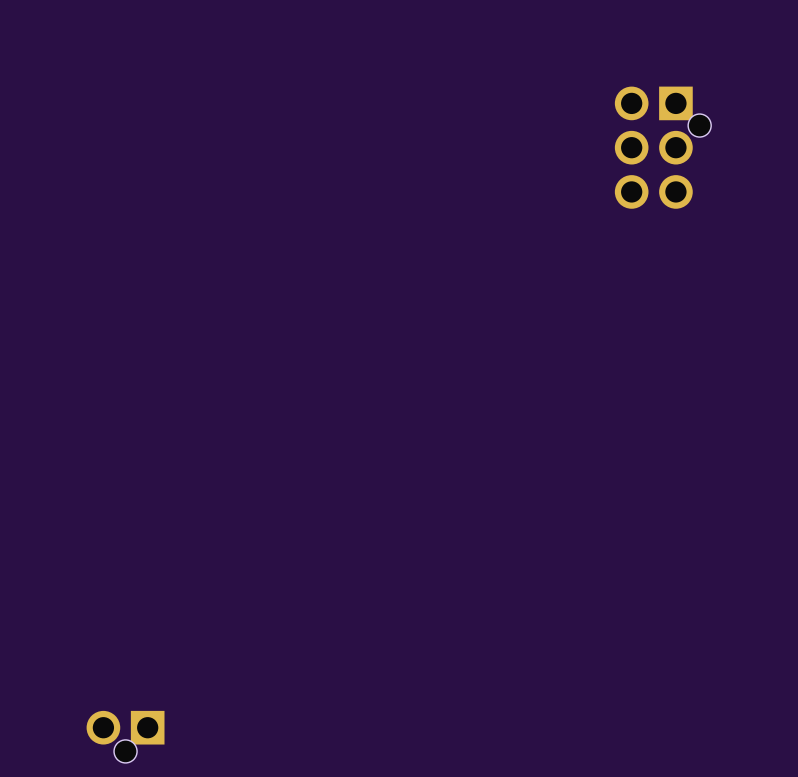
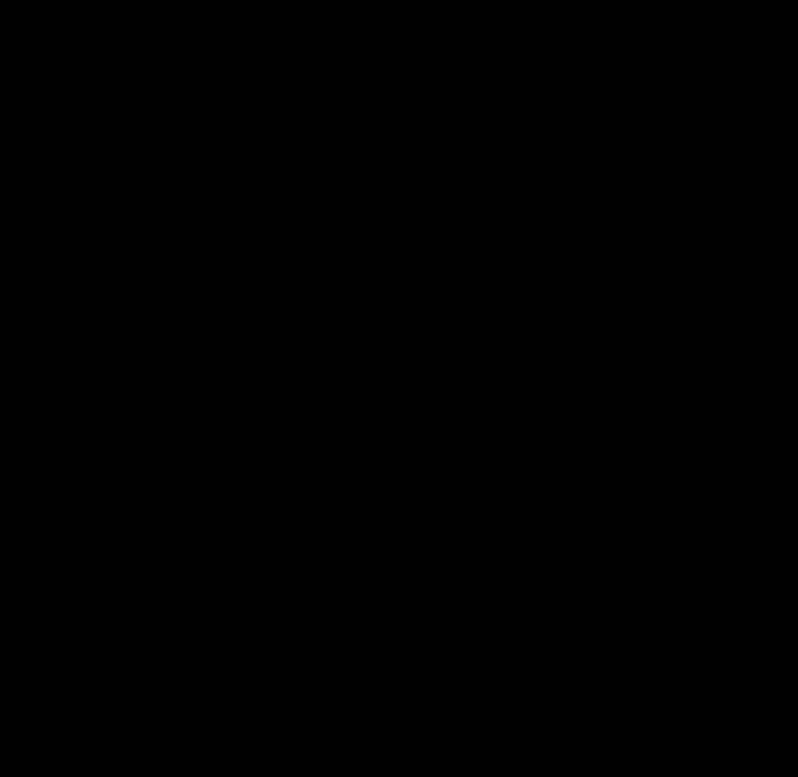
part: (663, 147) -> none
part: (125, 736) -> none

